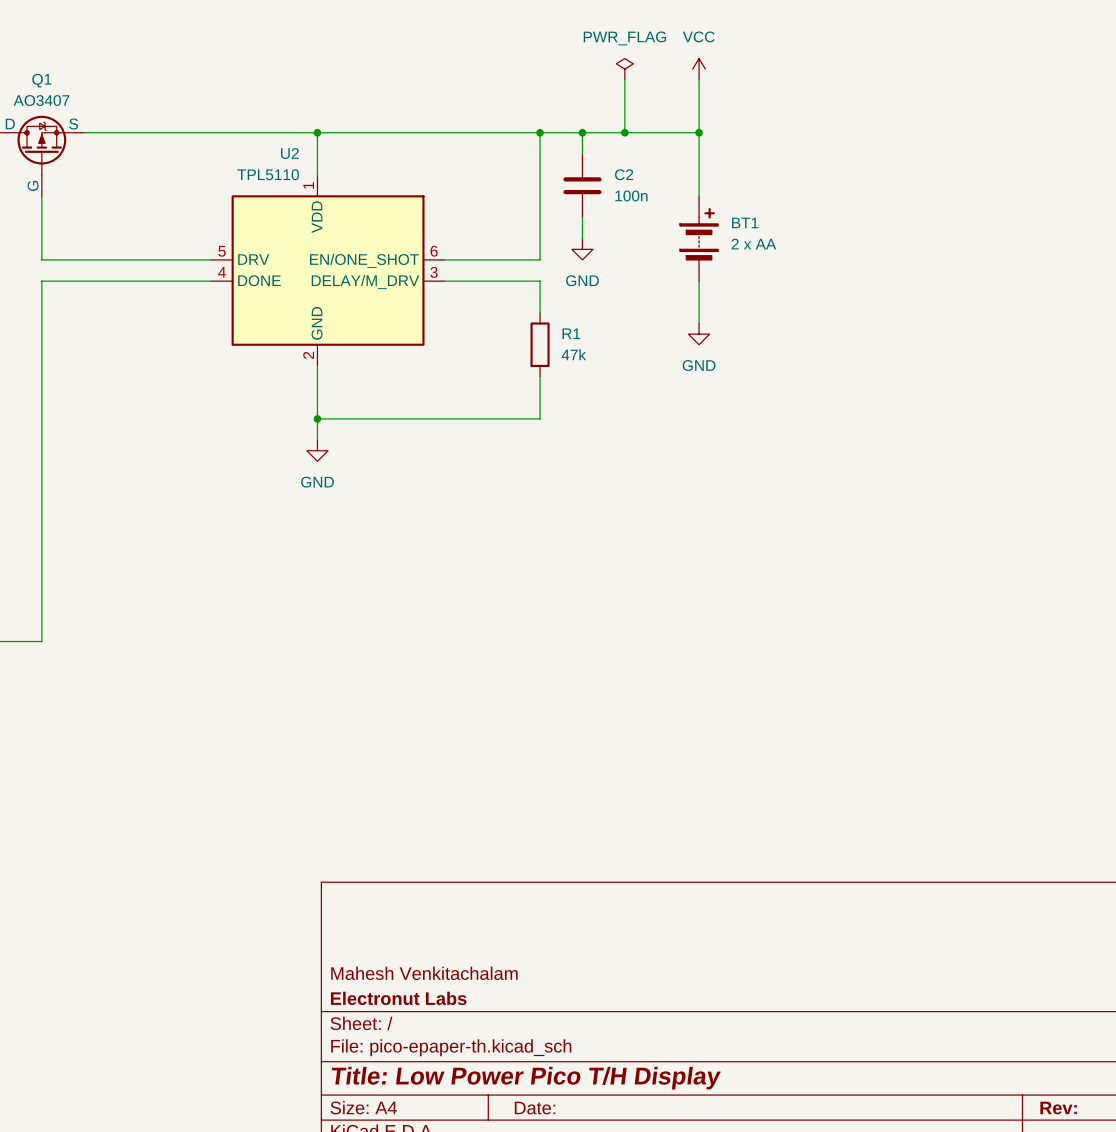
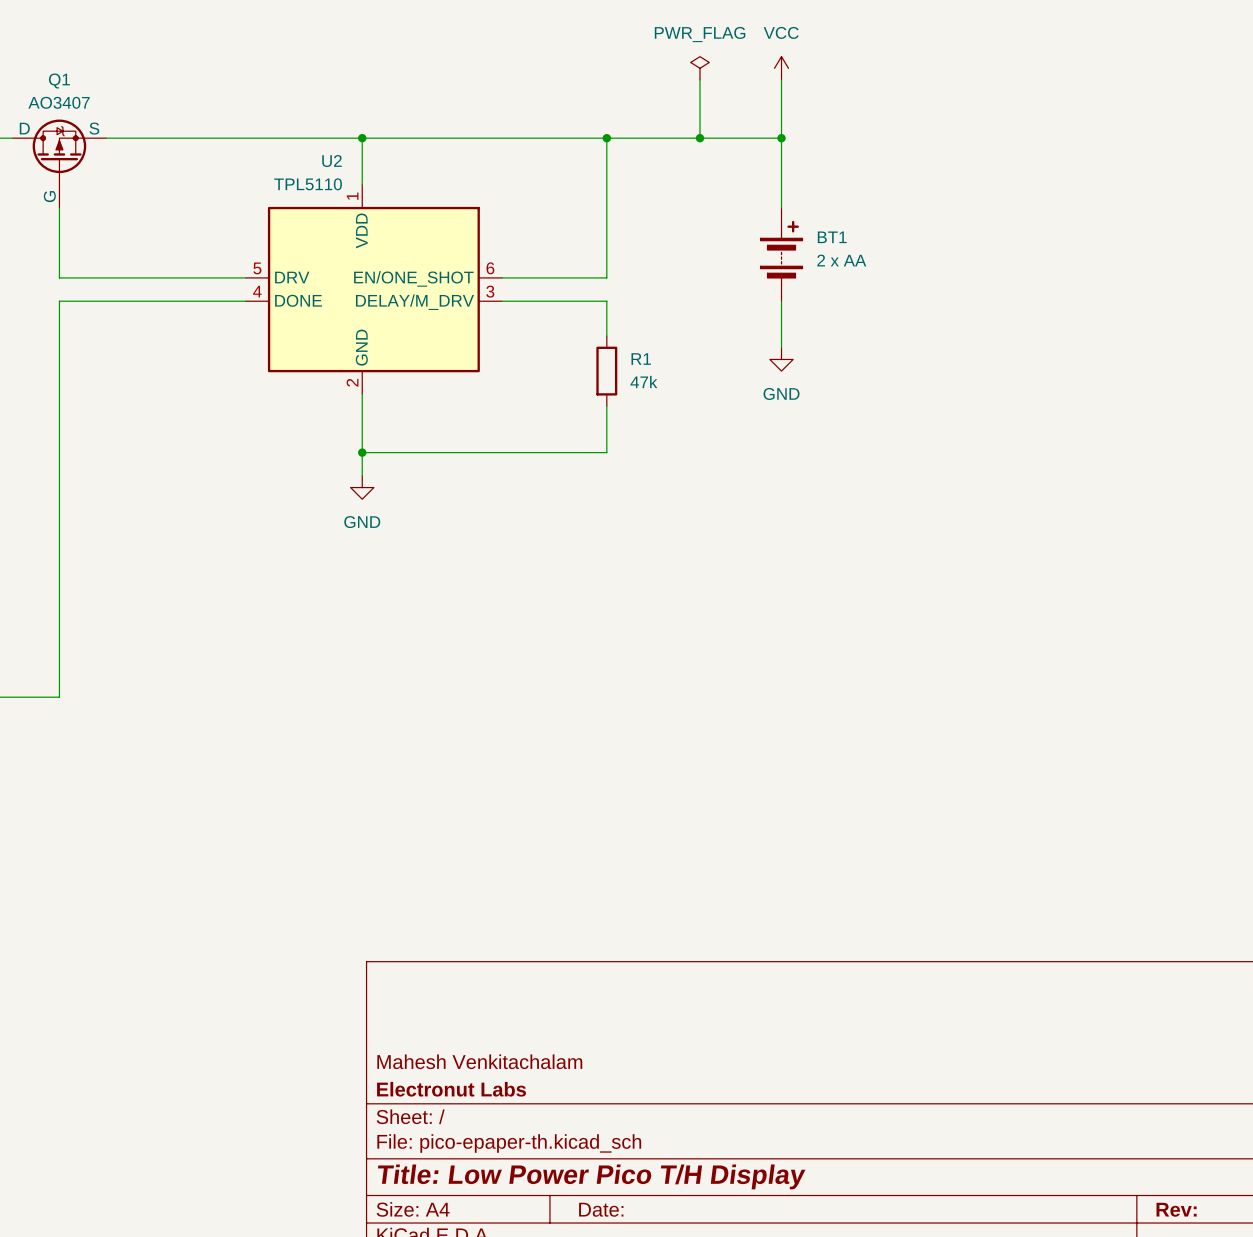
wire: (582, 132) (582, 153) -> none
junction: (582, 132) -> none
C2: 100n (582, 185) -> none
wire: (582, 217) (582, 238) -> none
power symbol: GND (582, 249) -> none

